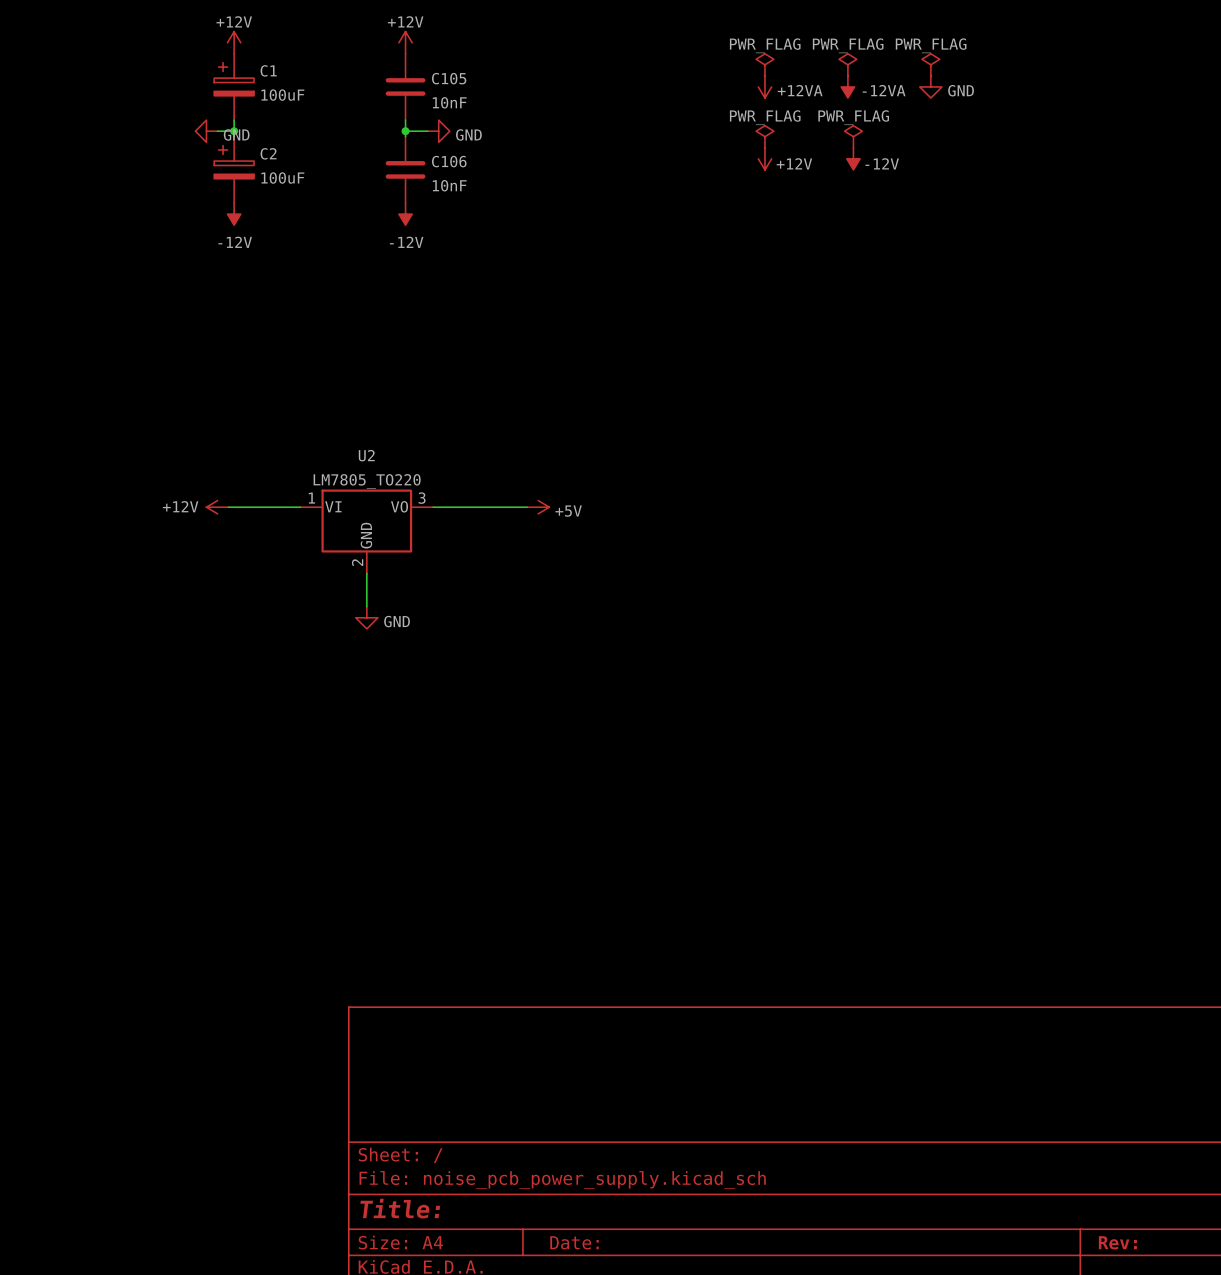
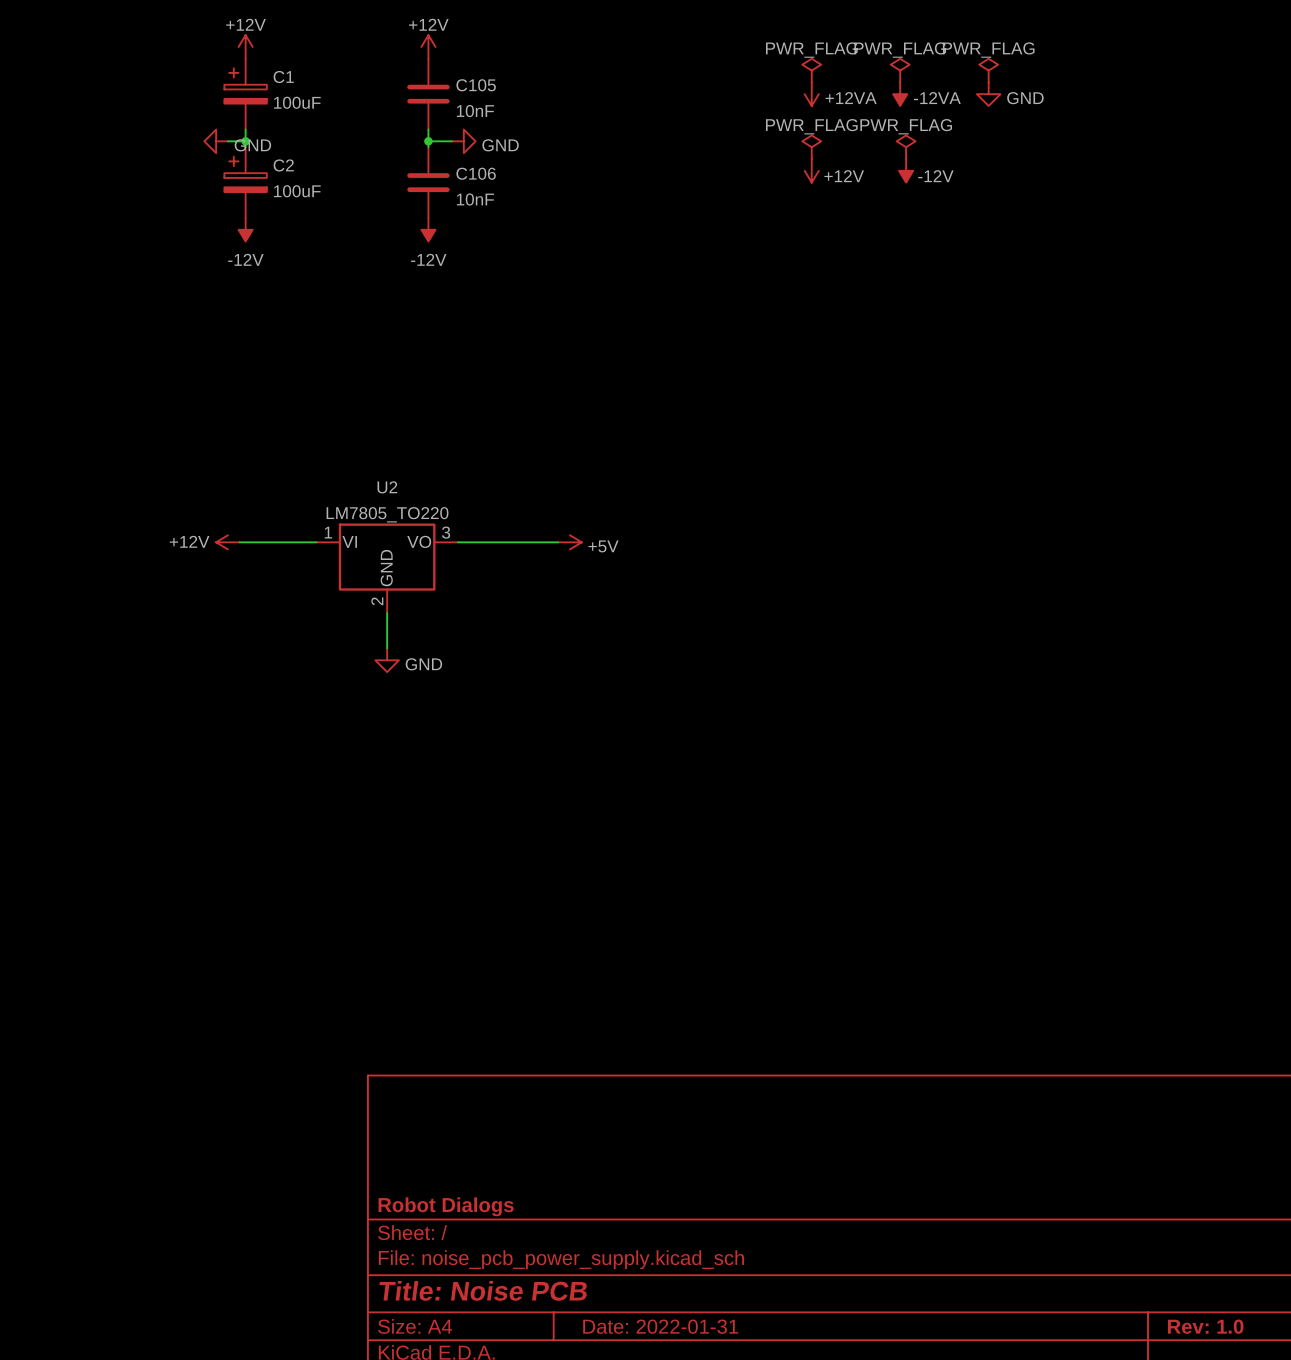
title block: none -> Robot Dialogs (446, 1206)
title block: Title: (400, 1208) -> Title: Noise PCB (483, 1290)
title block: Date: (574, 1242) -> Date: 2022-01-31 (660, 1326)
title block: Rev: (1117, 1242) -> Rev: 1.0 (1205, 1326)

